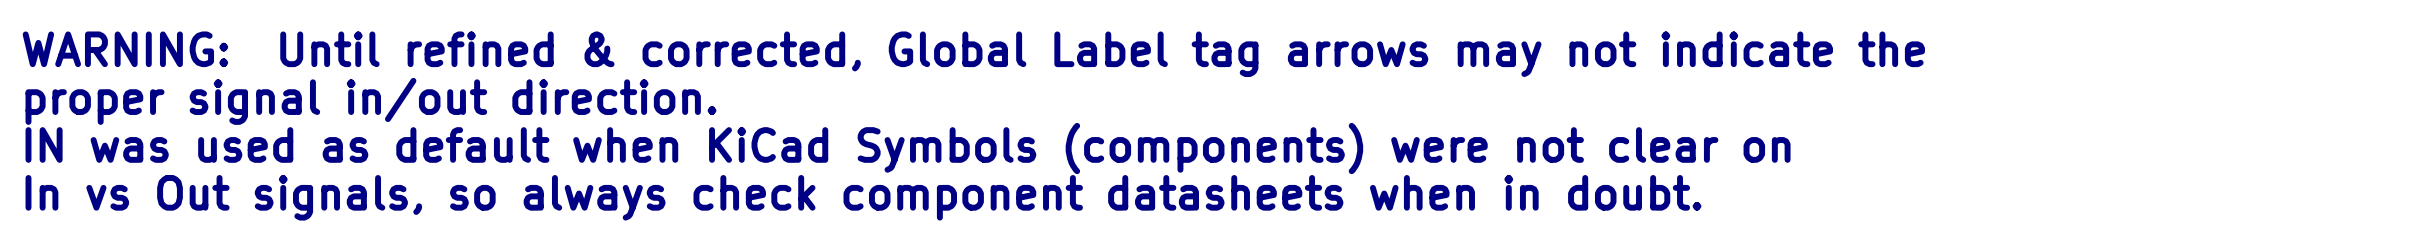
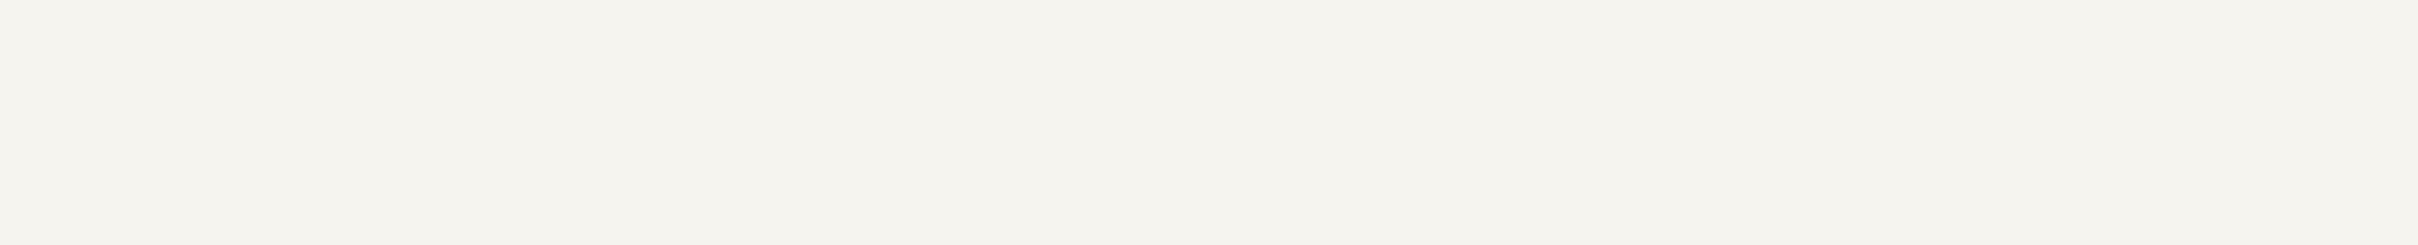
text: WARNING: Until refined & corrected, Global Label tag arrows may not indicate the (973, 54) -> none
text: proper signal in/out direction. (370, 101) -> none
text: IN was used as default when KiCad Symbols (components) were not clear on (908, 148) -> none
text: In vs Out signals, so always check component datasheets when in doubt. (863, 197) -> none

